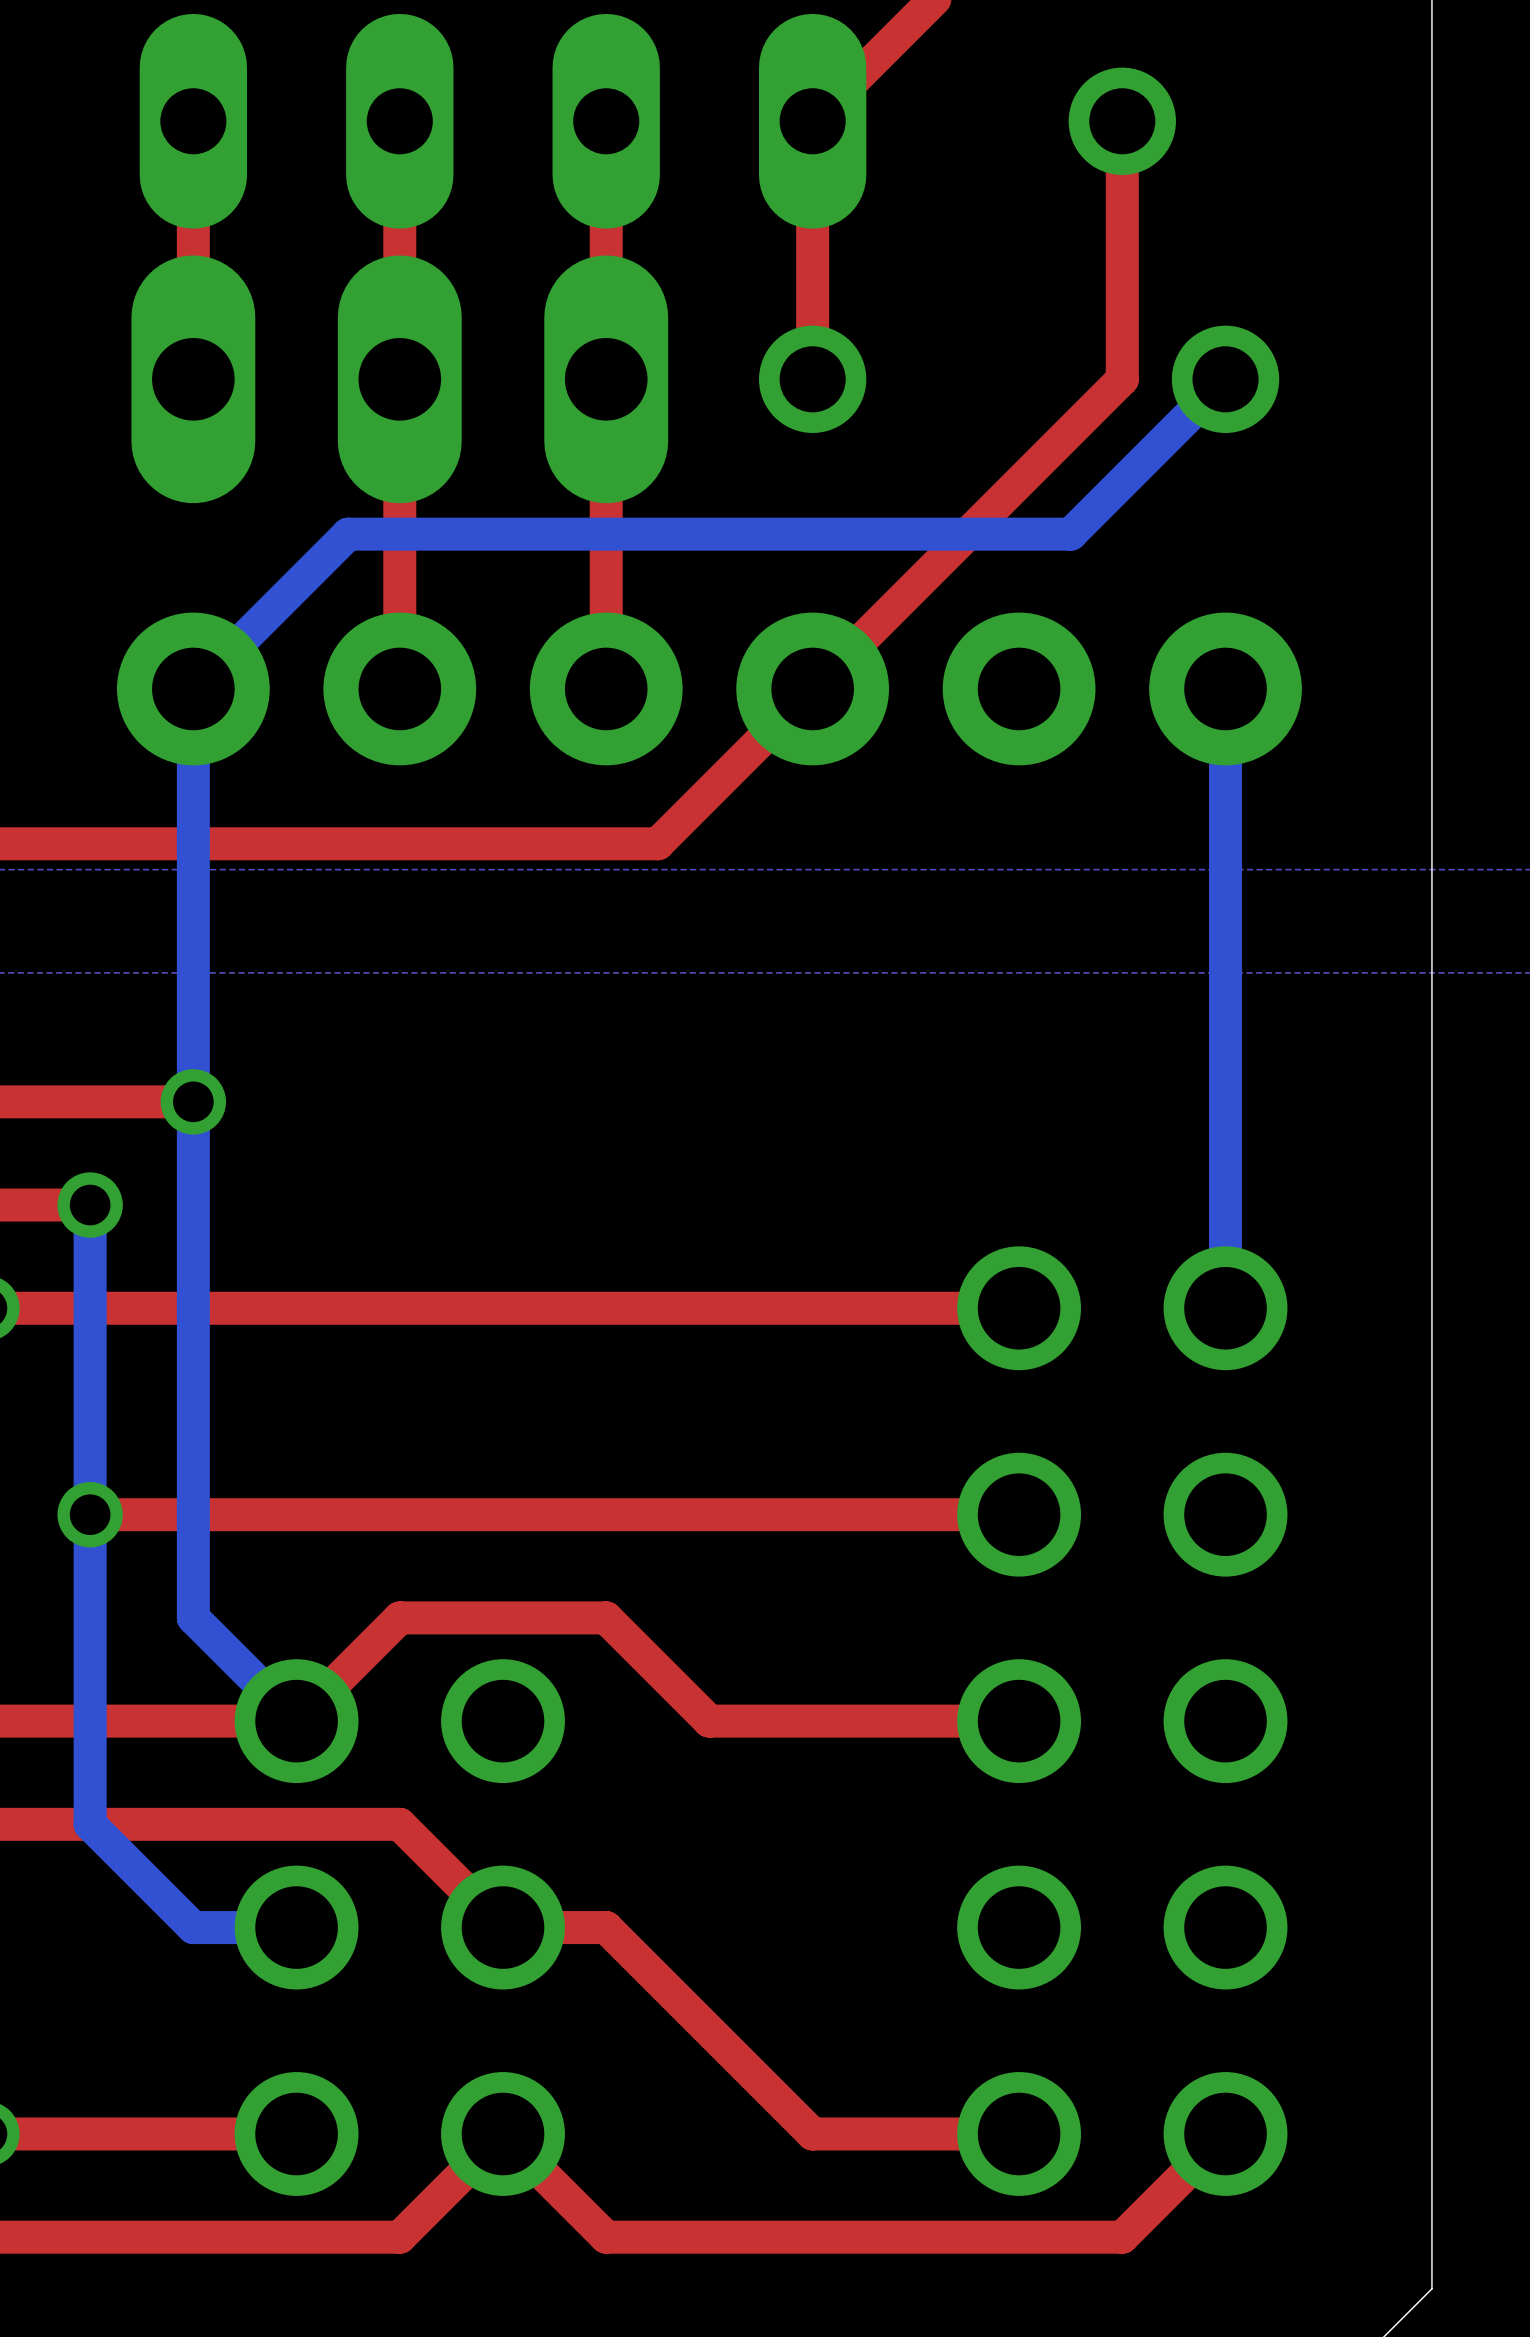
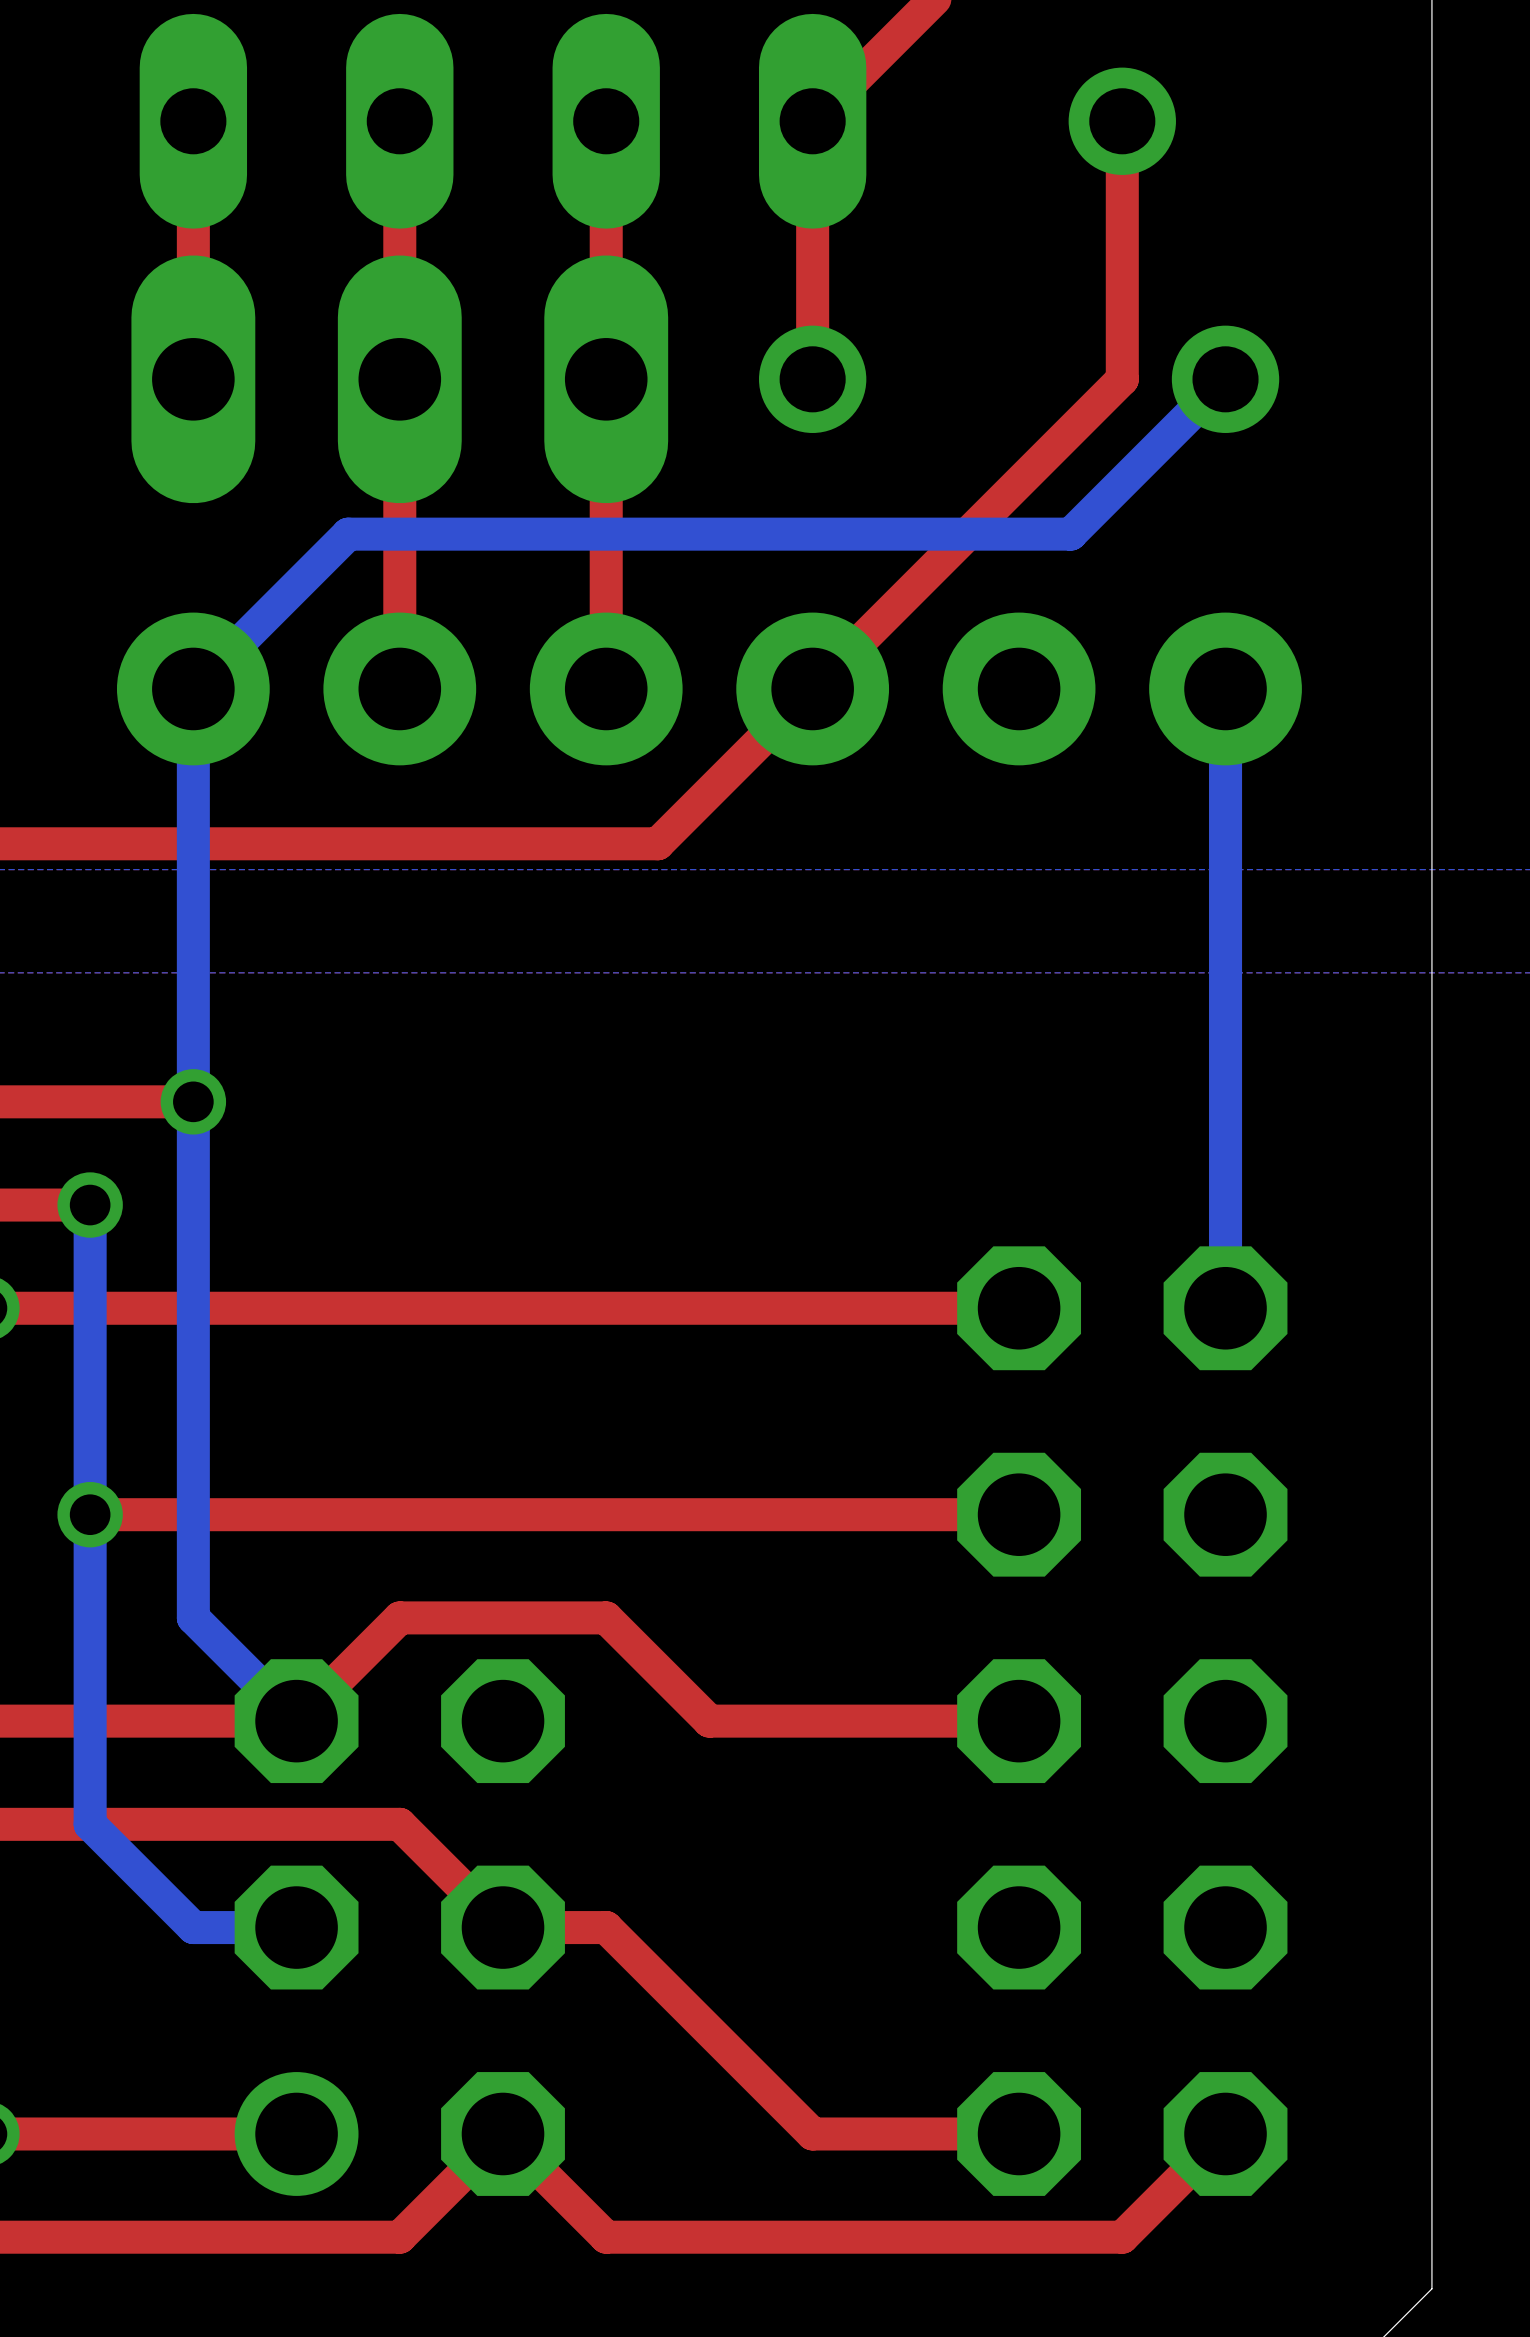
part footprint: [957, 1246, 1288, 2196] -> [957, 1246, 1288, 2196]
part footprint: [234, 1659, 565, 2196] -> [234, 1659, 565, 2196]

